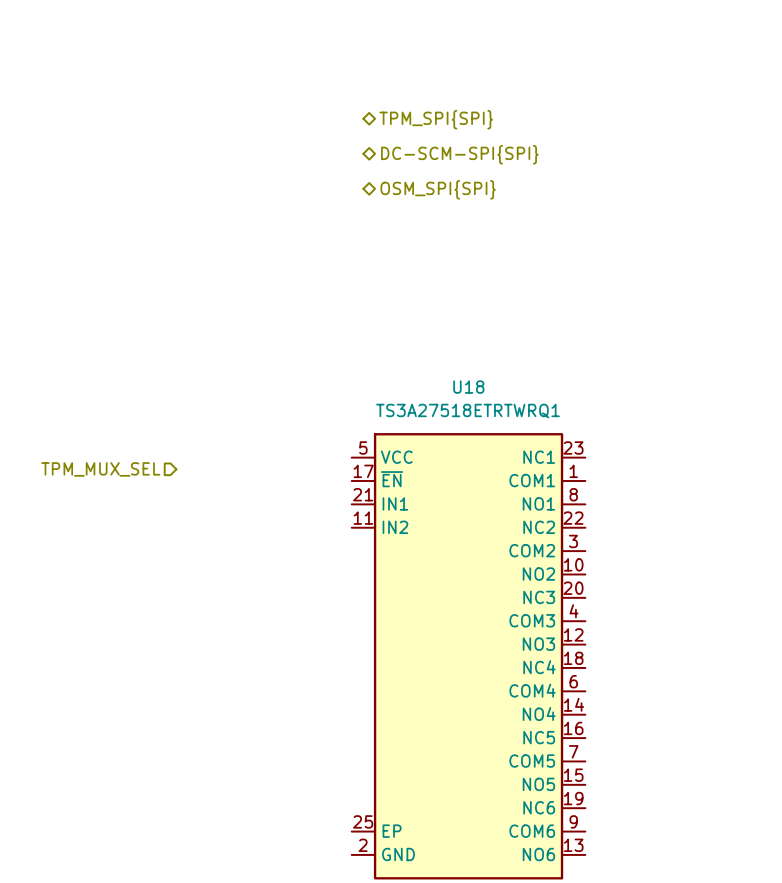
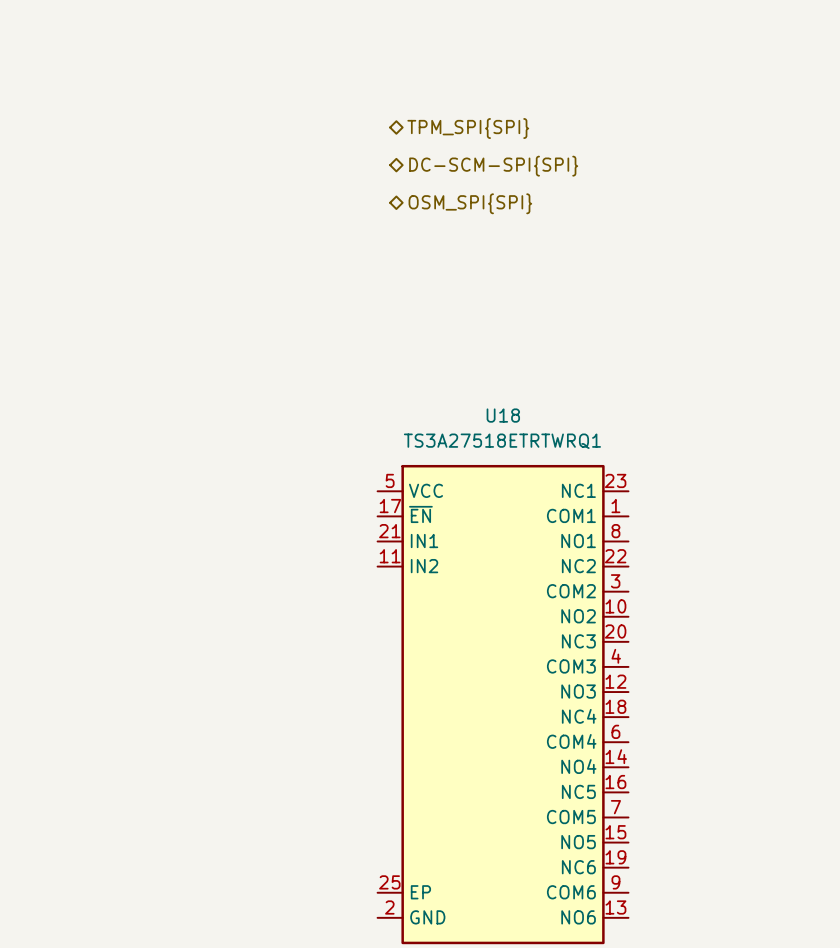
hierarchical label: TPM_MUX_SEL (100, 469) -> none

